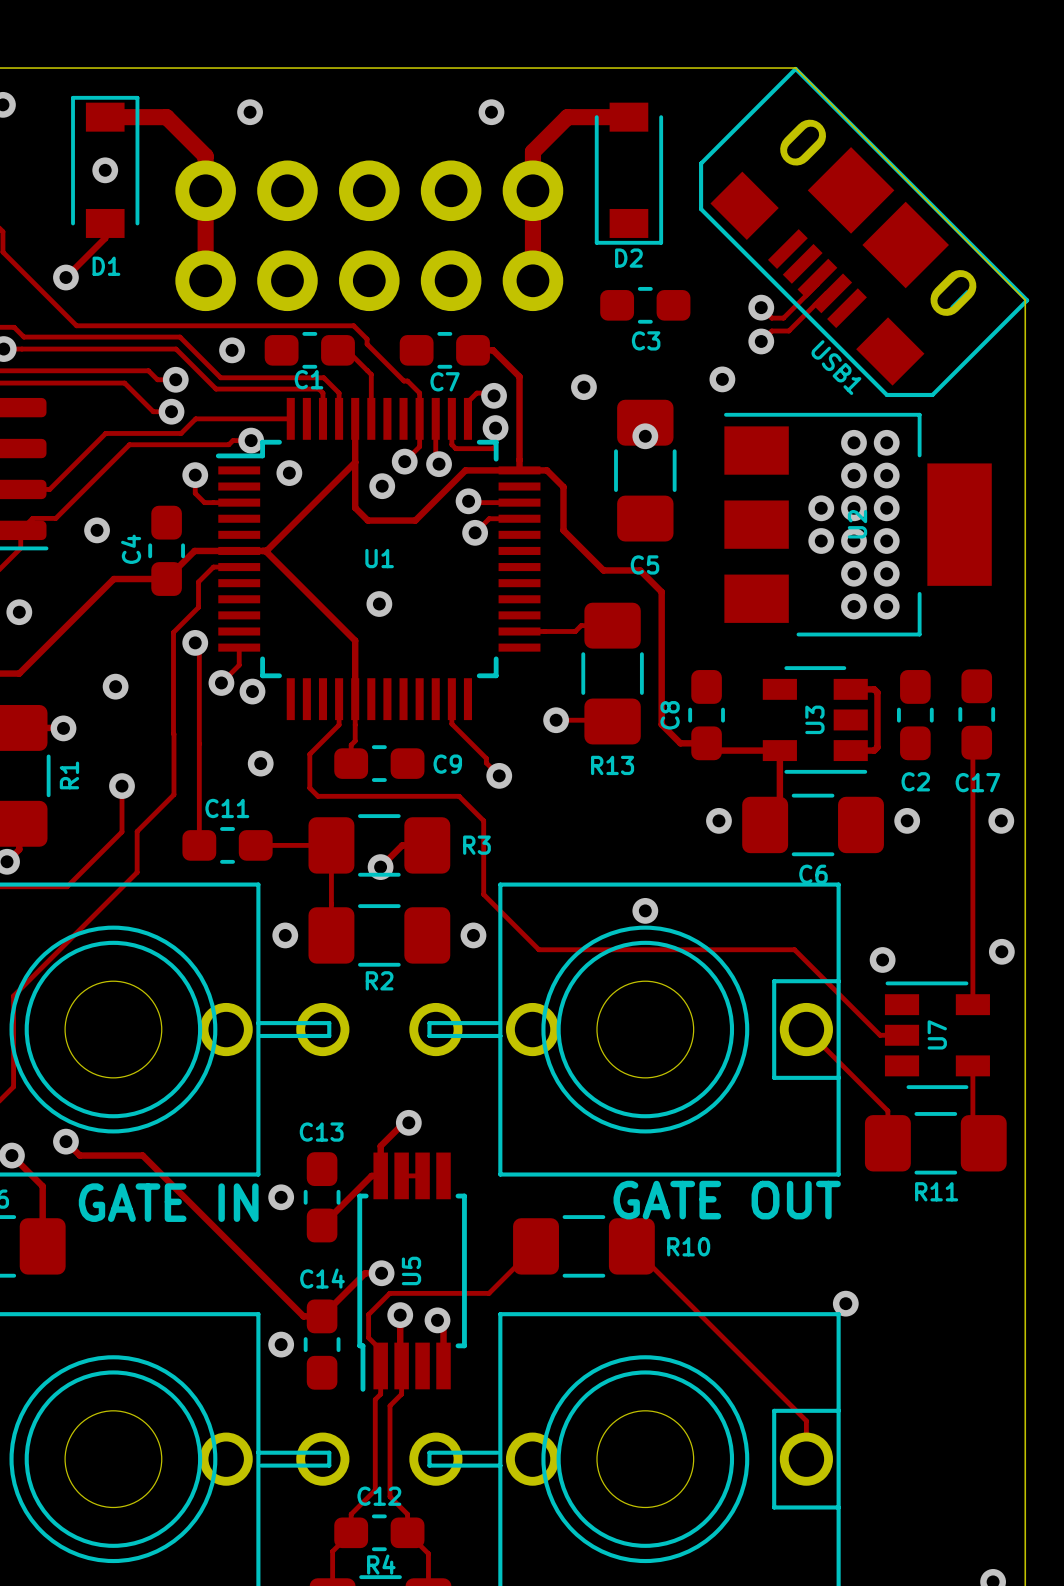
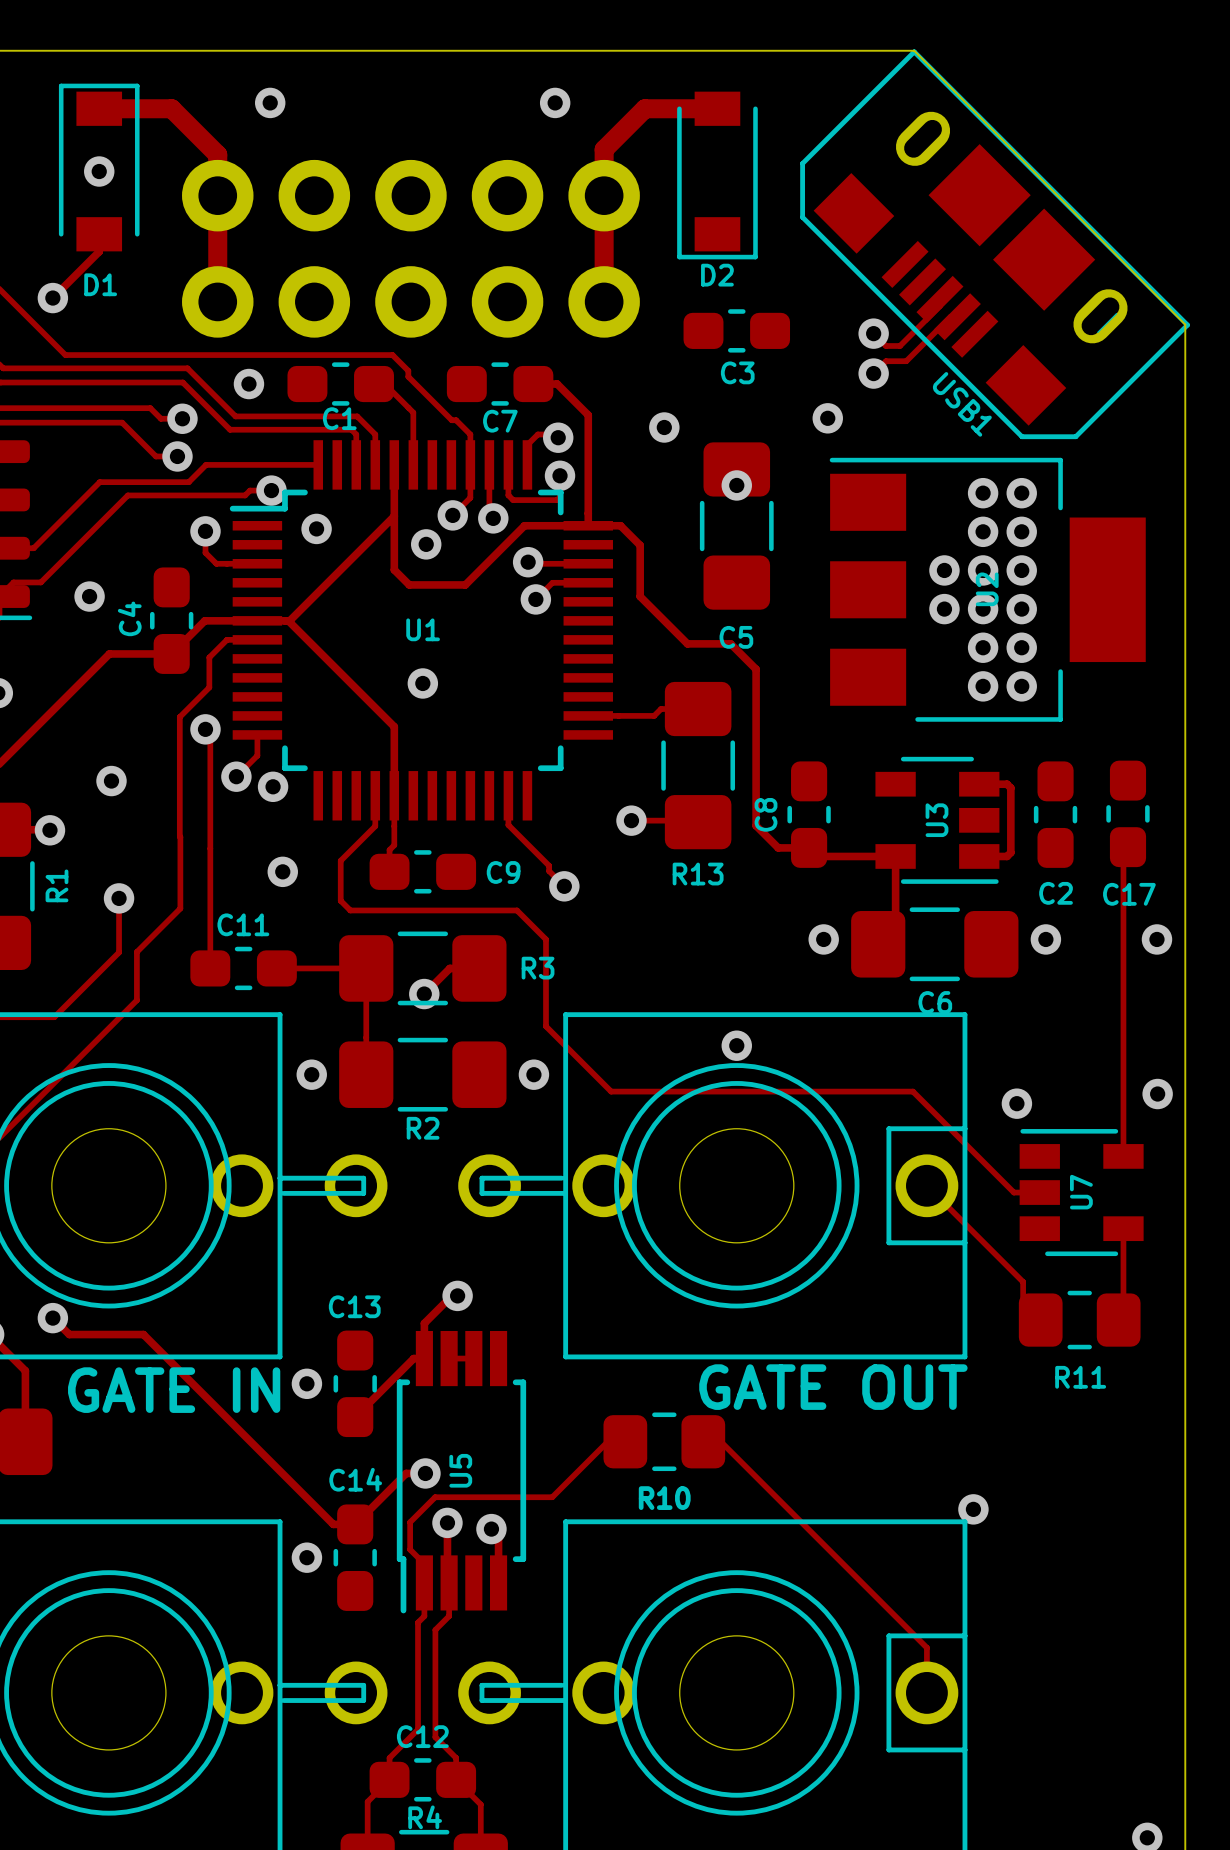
R11 footprint: [864, 1112, 1007, 1175] -> [1018, 1290, 1141, 1350]
R10 footprint: [513, 1215, 655, 1278] -> [603, 1412, 726, 1472]
R10 name position: R10 (688, 1246) -> R10 (664, 1498)

